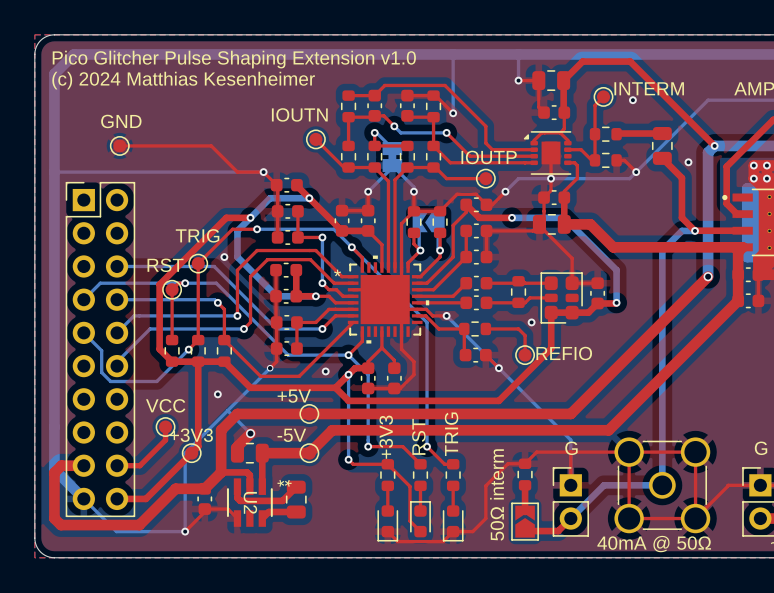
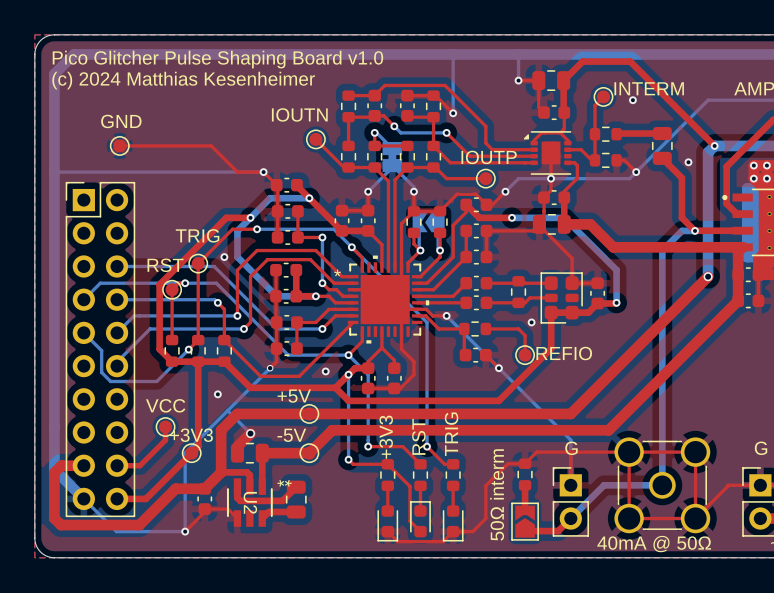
text: Pico Glitcher Pulse Shaping Extension v1.0 (234, 59) -> Pico Glitcher Pulse Shaping Board v1.0 (217, 59)

